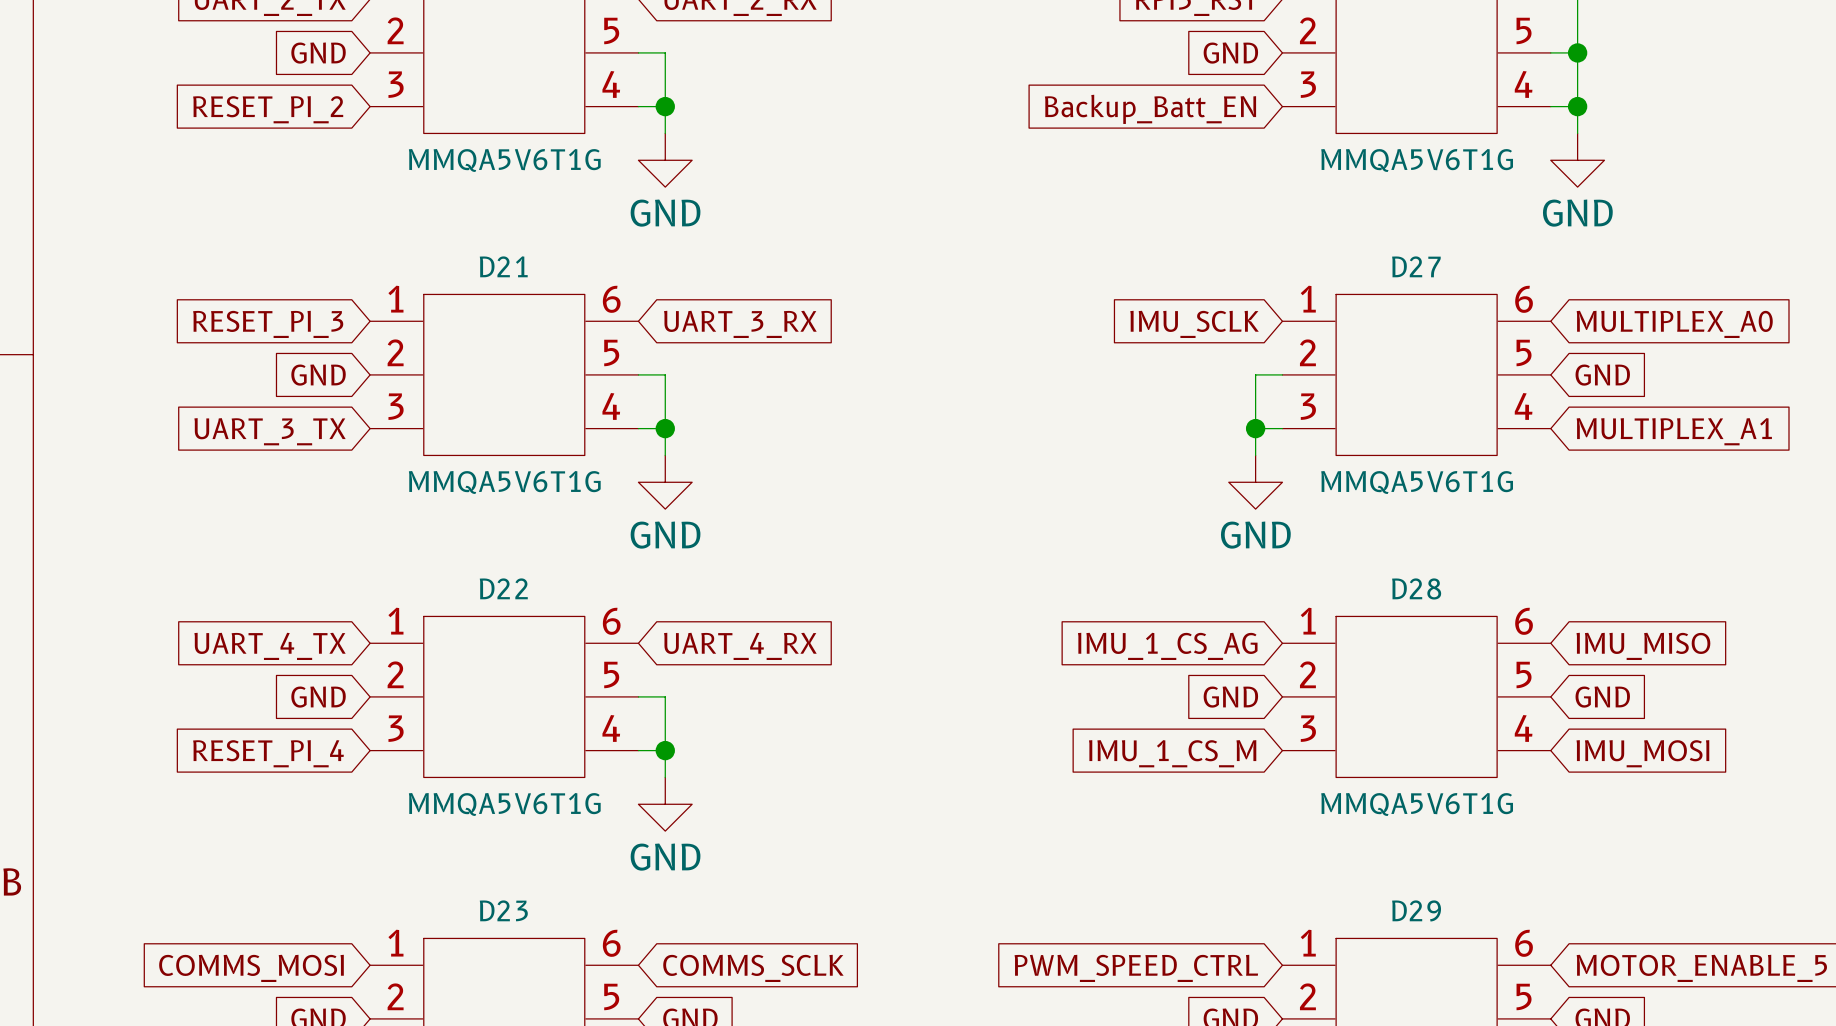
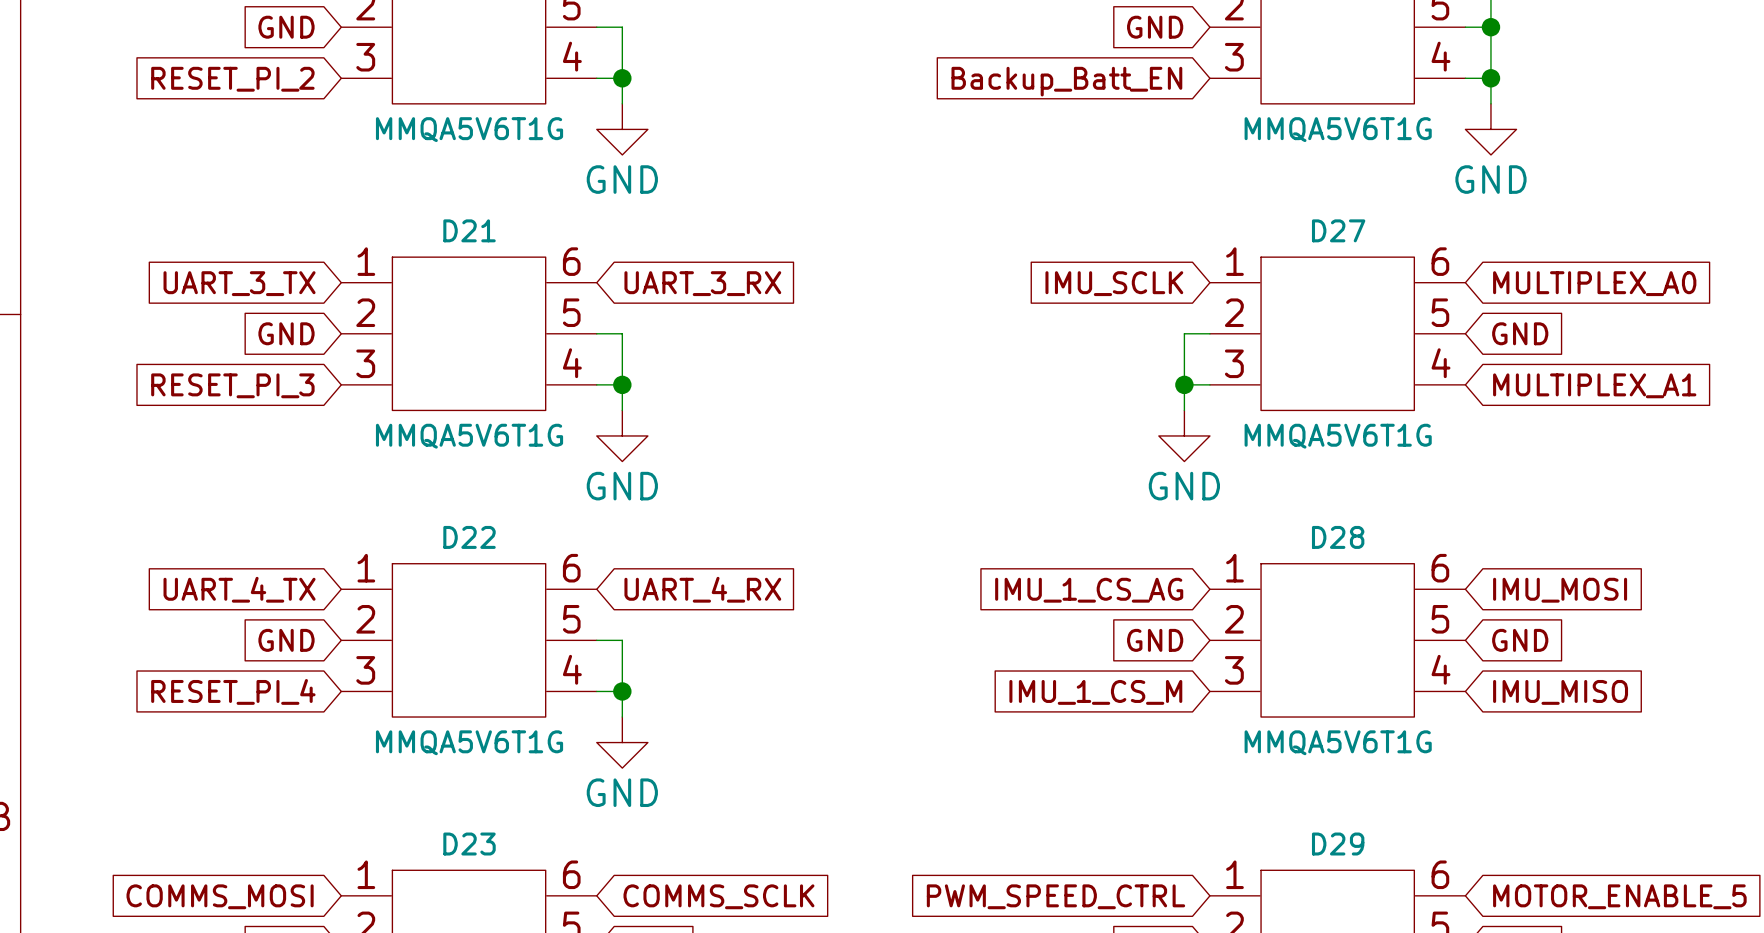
global label: RESET_PI_3 (268, 324) -> UART_3_TX (239, 283)
global label: UART_3_TX (270, 431) -> RESET_PI_3 (232, 385)
global label: IMU_MISO (1643, 646) -> IMU_MOSI (1560, 590)
global label: IMU_MOSI (1642, 753) -> IMU_MISO (1560, 692)

